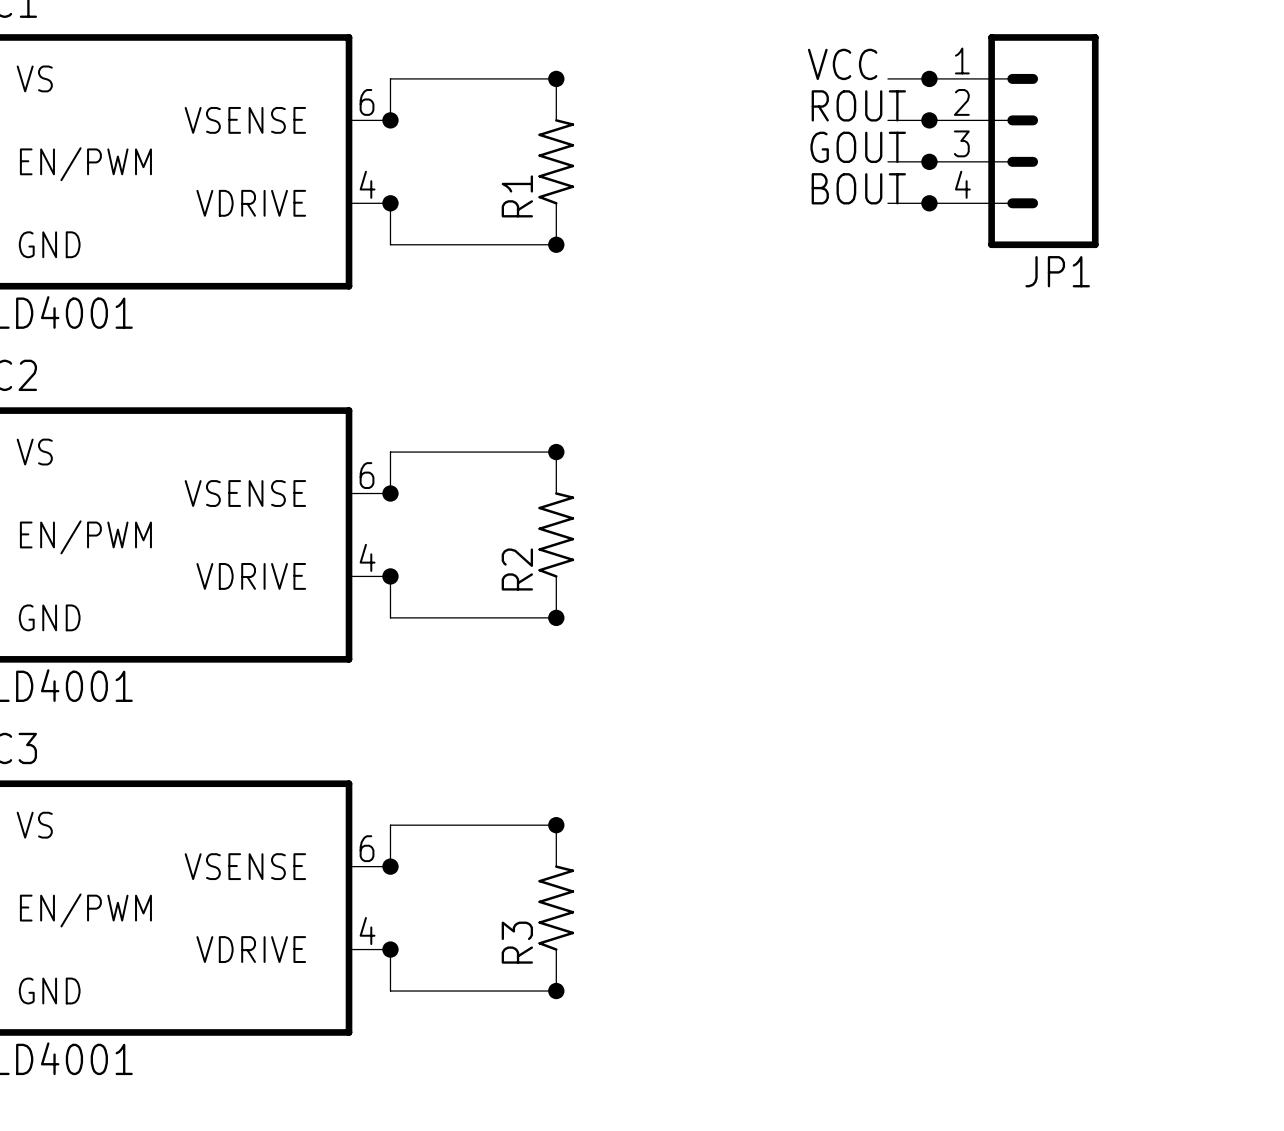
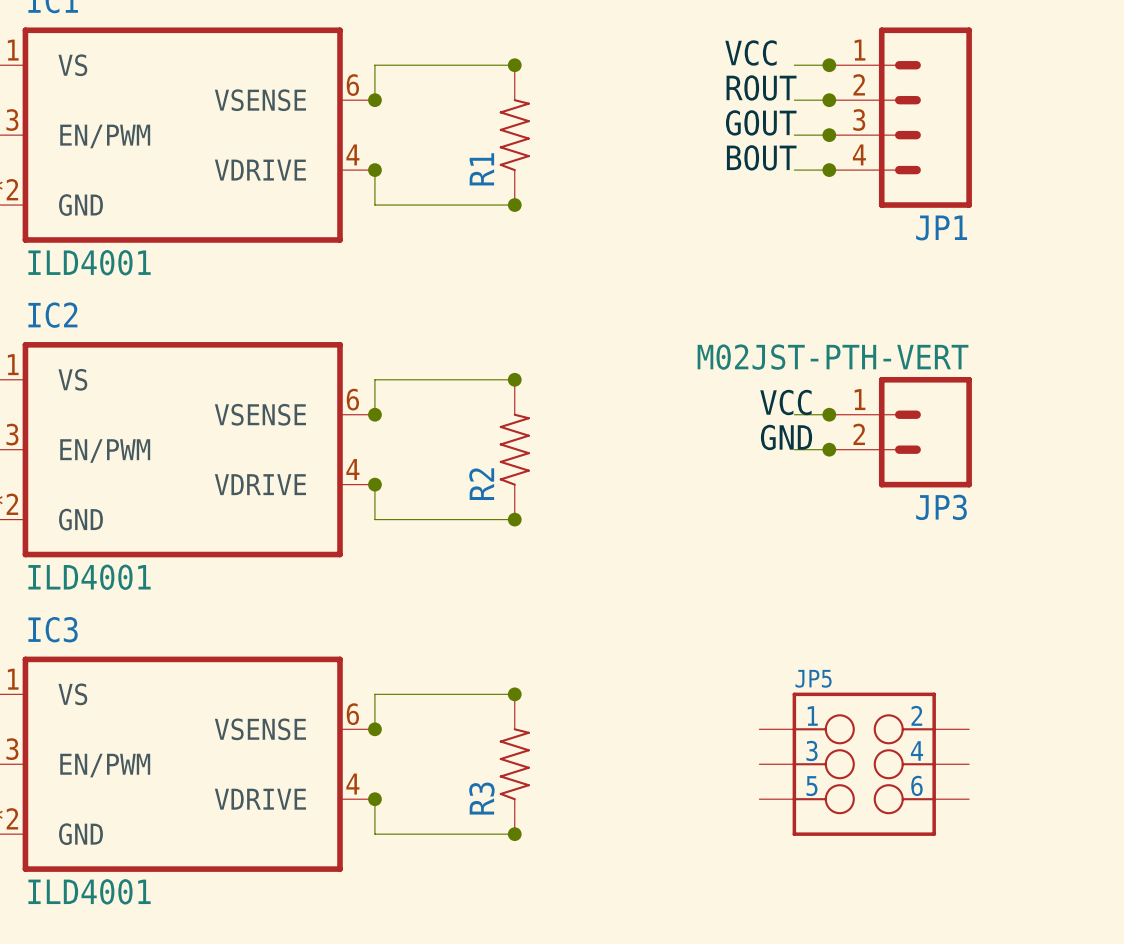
label: none -> VCC (785, 402)
wire: none -> (794, 414) (829, 414)
junction: none -> (829, 414)
JP3: none -> M02JST-PTH-VERT (900, 432)
label: none -> GND (786, 437)
wire: none -> (794, 449) (829, 449)
junction: none -> (829, 449)
JP5: none -> (864, 764)

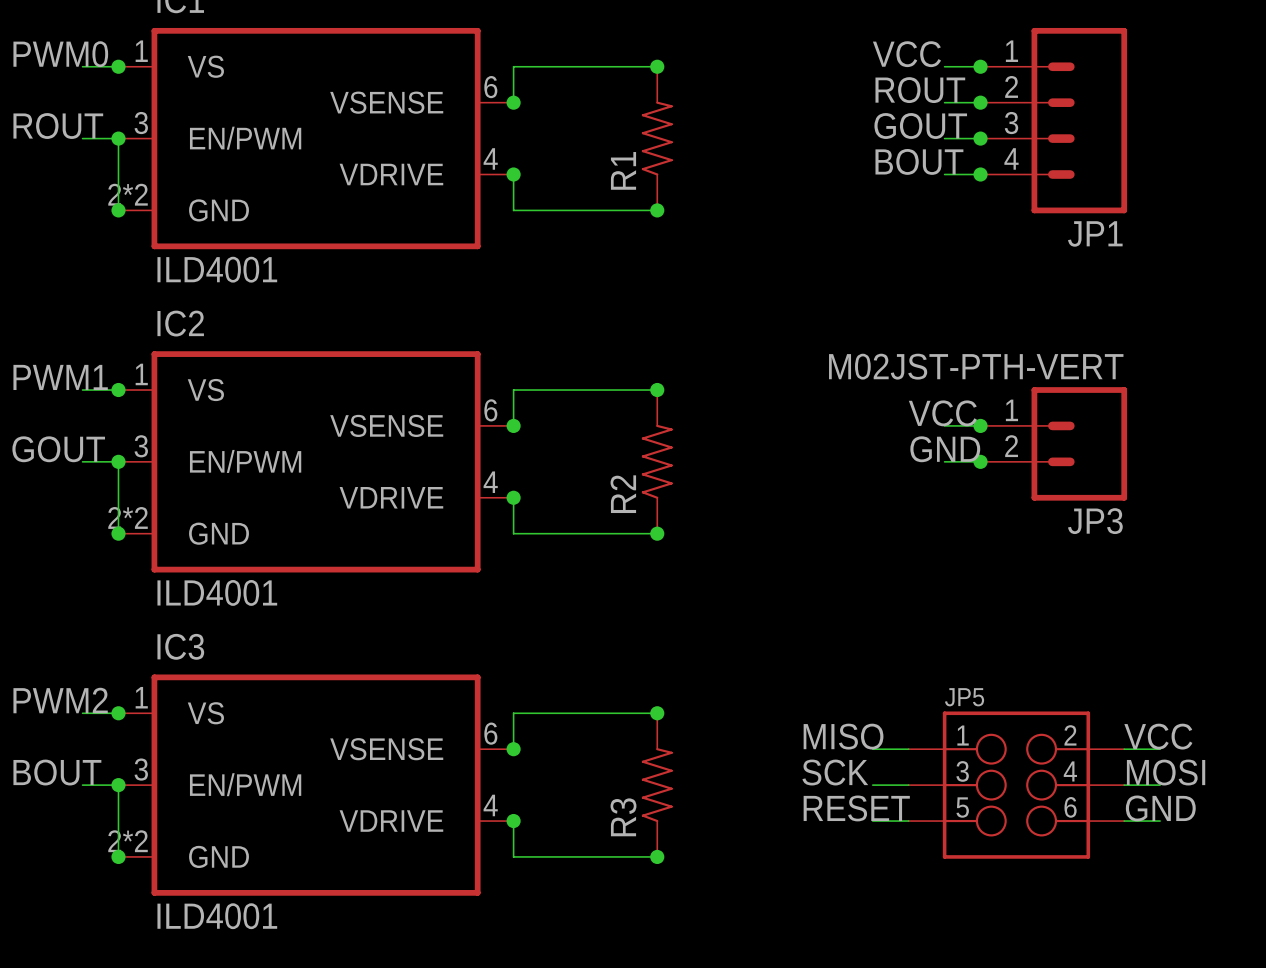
label: none -> MISO (843, 736)
label: none -> VCC (1158, 736)
wire: none -> (872, 749) (908, 749)
wire: none -> (1124, 749) (1160, 749)
label: none -> SCK (835, 772)
label: none -> MOSI (1166, 772)
wire: none -> (872, 785) (908, 785)
wire: none -> (1124, 785) (1160, 785)
label: none -> RESET (856, 808)
label: none -> GND (1160, 808)
wire: none -> (872, 821) (908, 821)
wire: none -> (1124, 821) (1160, 821)

